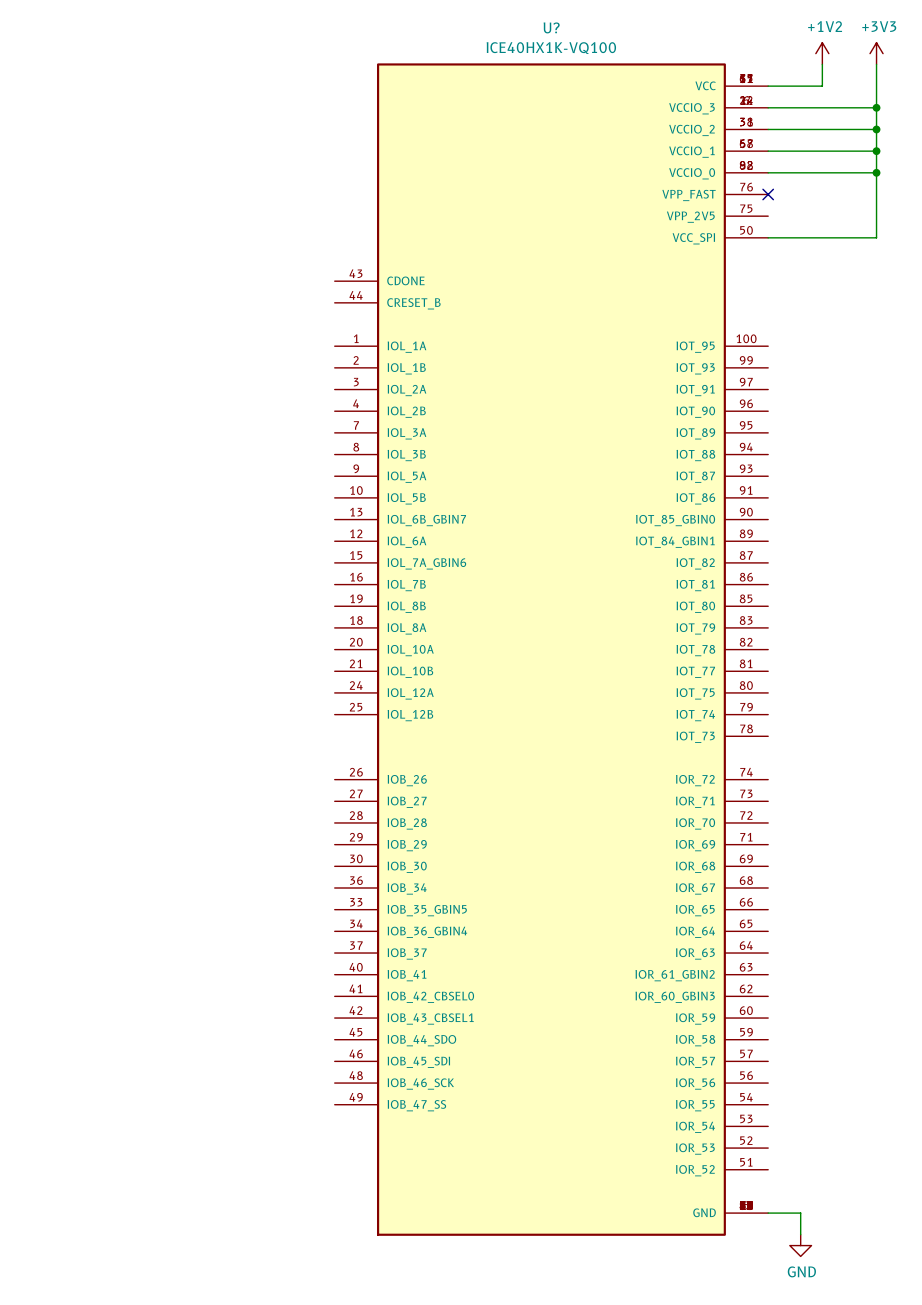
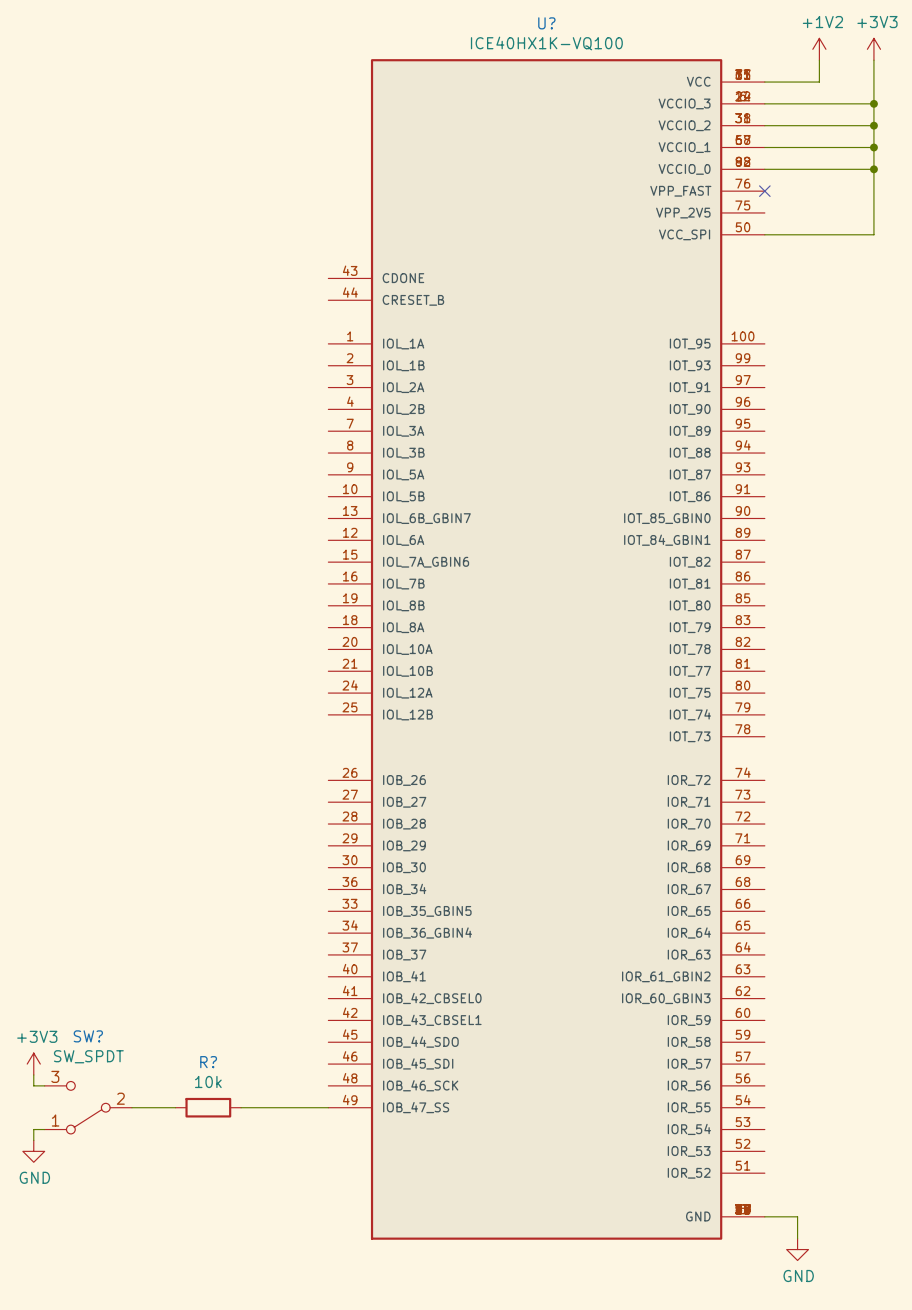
power symbol: none -> +3V3 (33, 1064)
wire: none -> (33, 1074) (33, 1085) (44, 1085)
SW?: none -> SW_SPDT (88, 1107)
wire: none -> (131, 1107) (175, 1107)
R?: none -> 10k (208, 1107)
wire: none -> (241, 1107) (328, 1107)
wire: none -> (44, 1129) (33, 1129) (33, 1140)
power symbol: none -> GND (33, 1151)

